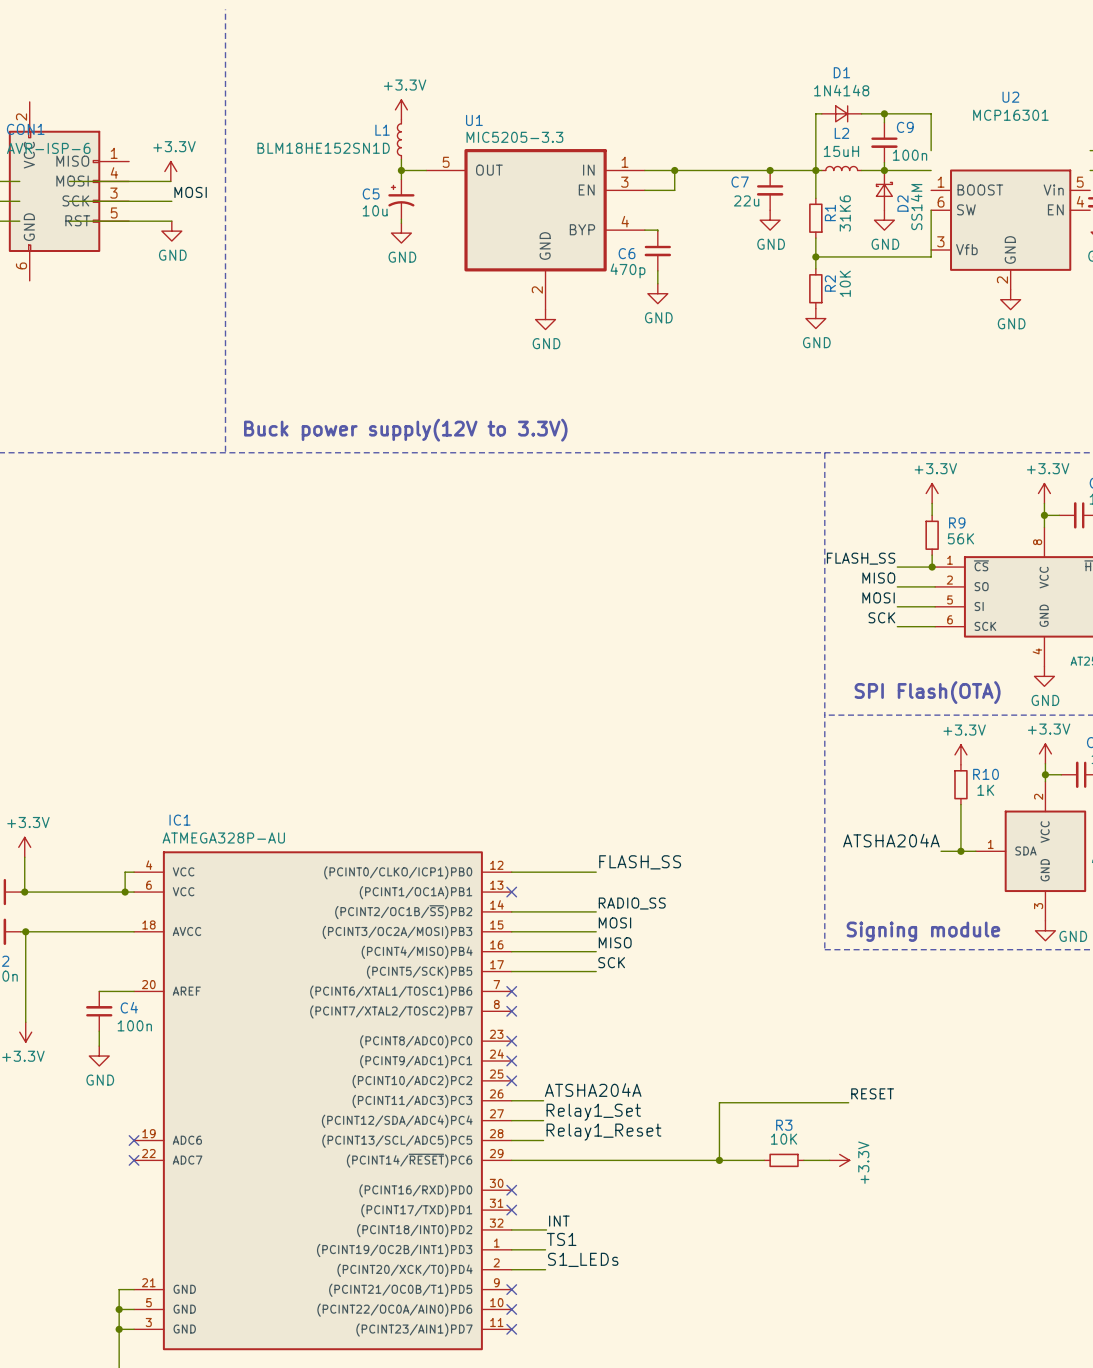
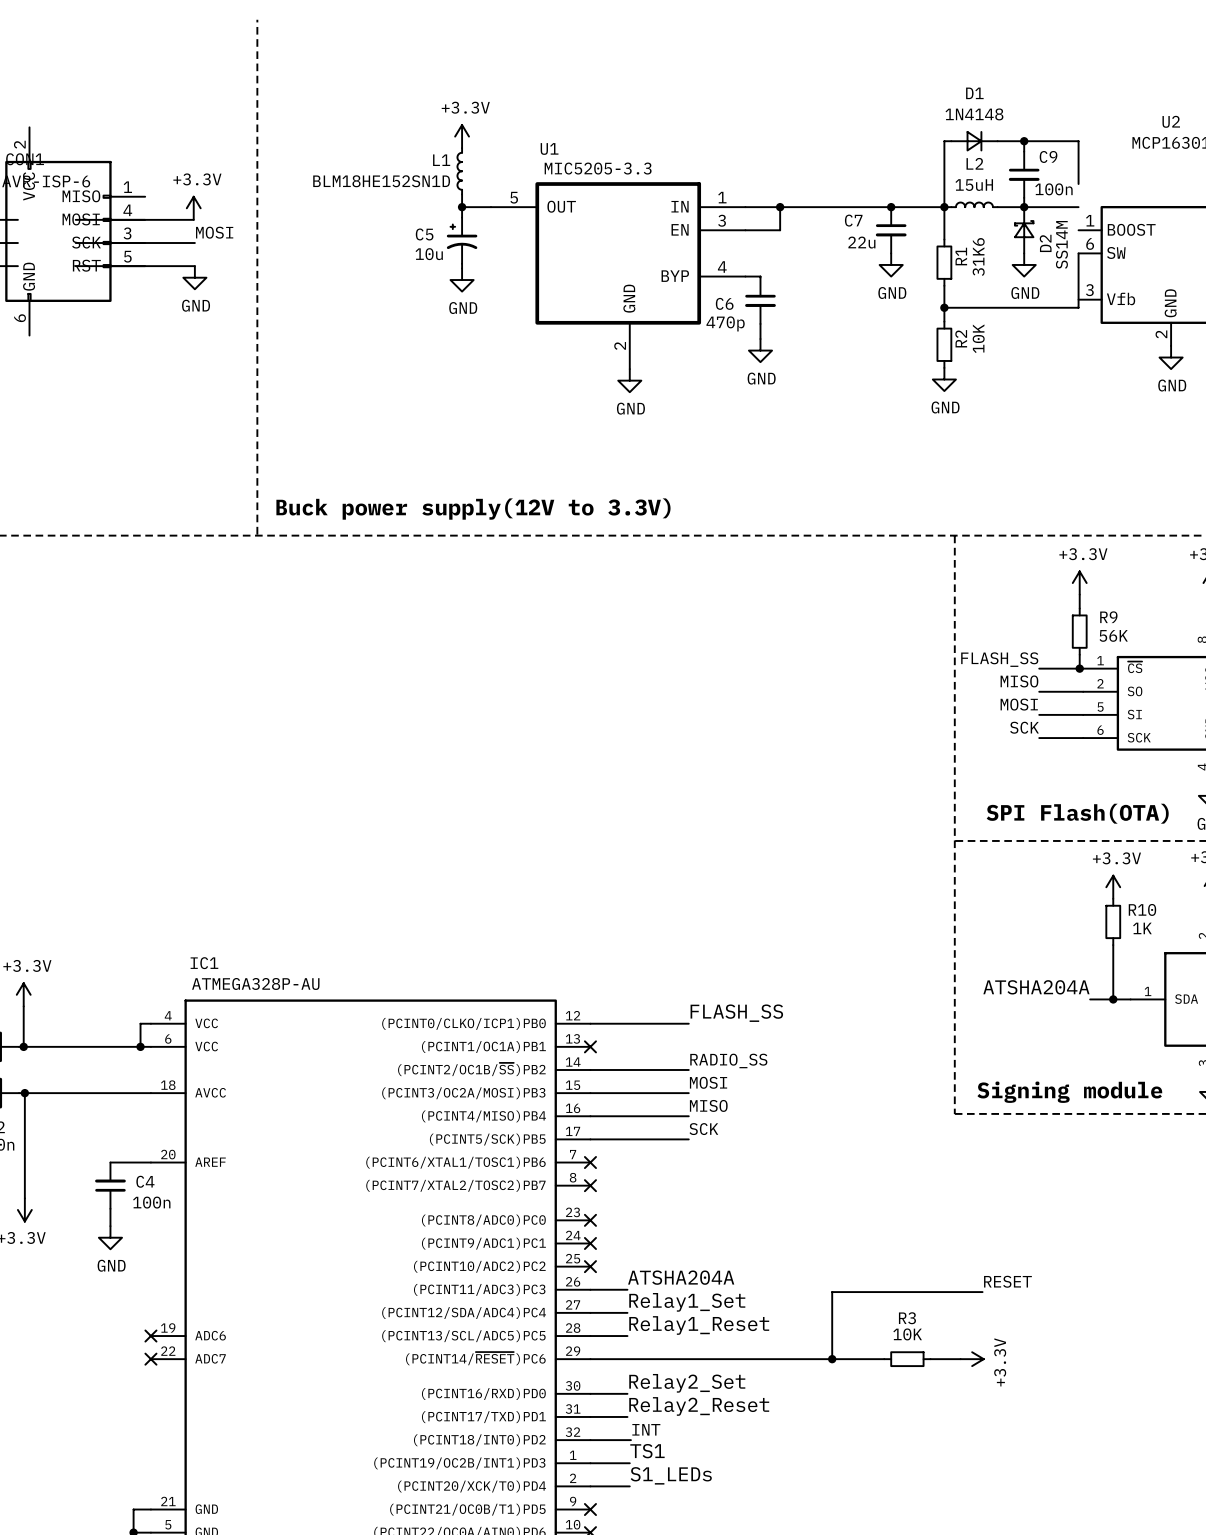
label: none -> Relay2_Set (687, 1383)
wire: none -> (590, 1393) (627, 1393)
no-connect mark: (511, 1190) -> none
label: none -> Relay2_Reset (699, 1406)
wire: none -> (590, 1416) (627, 1416)
no-connect mark: (511, 1210) -> none

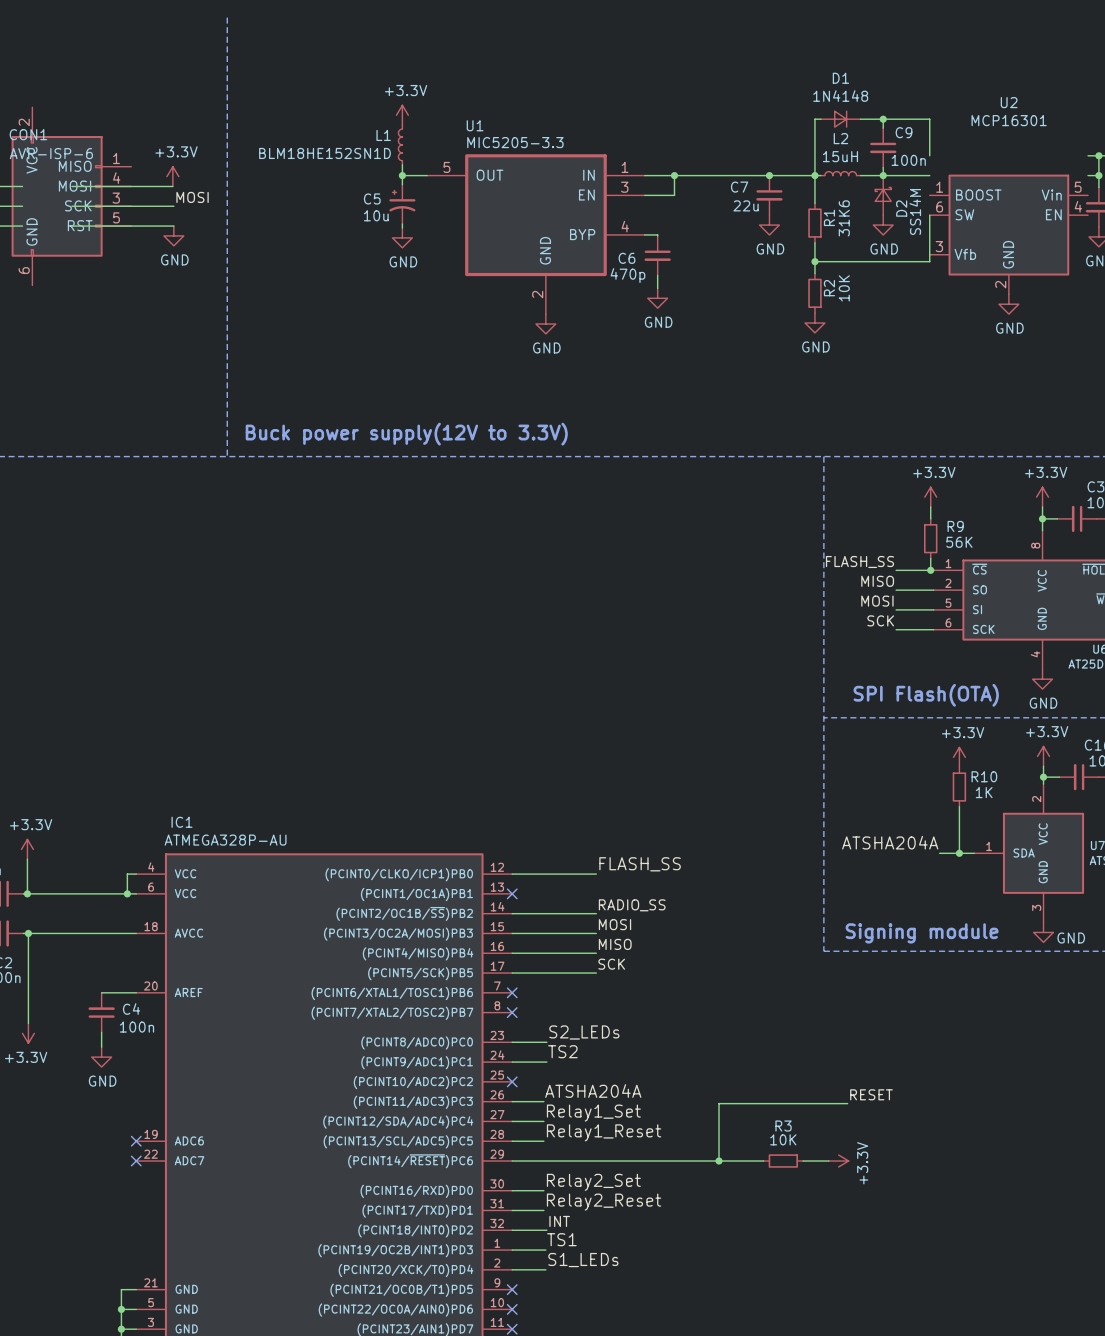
label: none -> S2_LEDs (584, 1032)
wire: none -> (512, 1042) (546, 1042)
no-connect mark: (590, 1220) -> none
label: none -> TS2 (562, 1051)
wire: none -> (512, 1062) (546, 1062)
no-connect mark: (590, 1243) -> none

